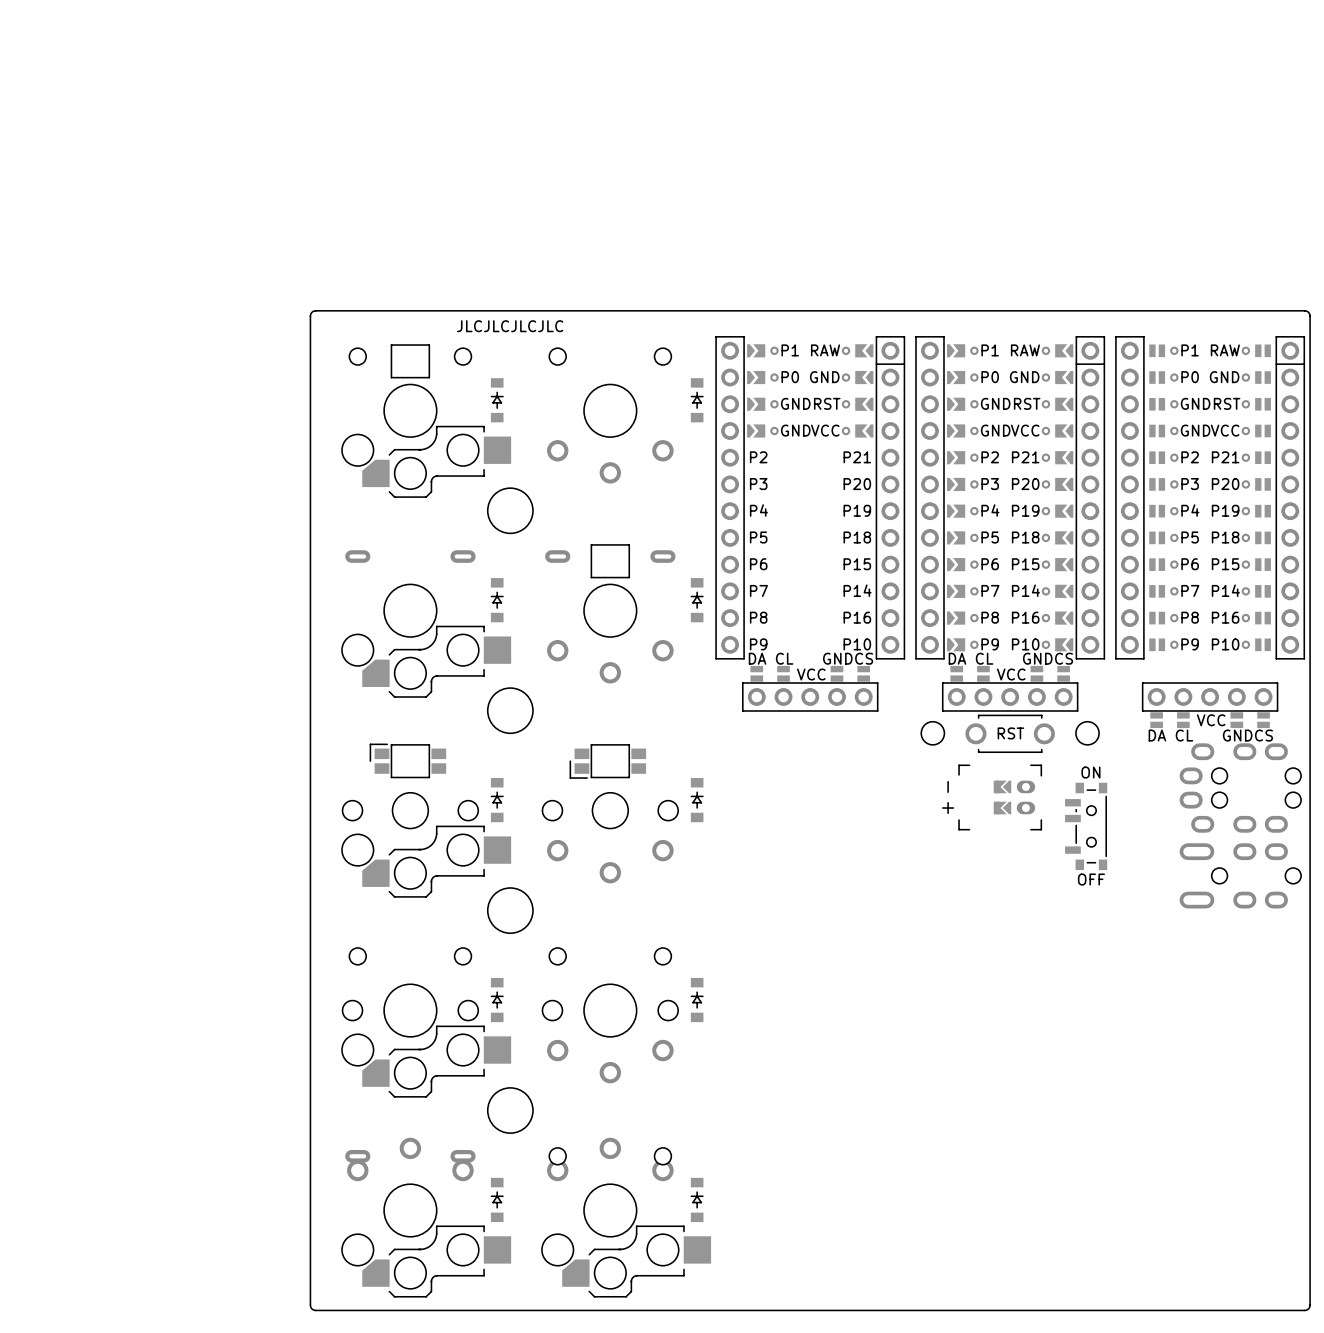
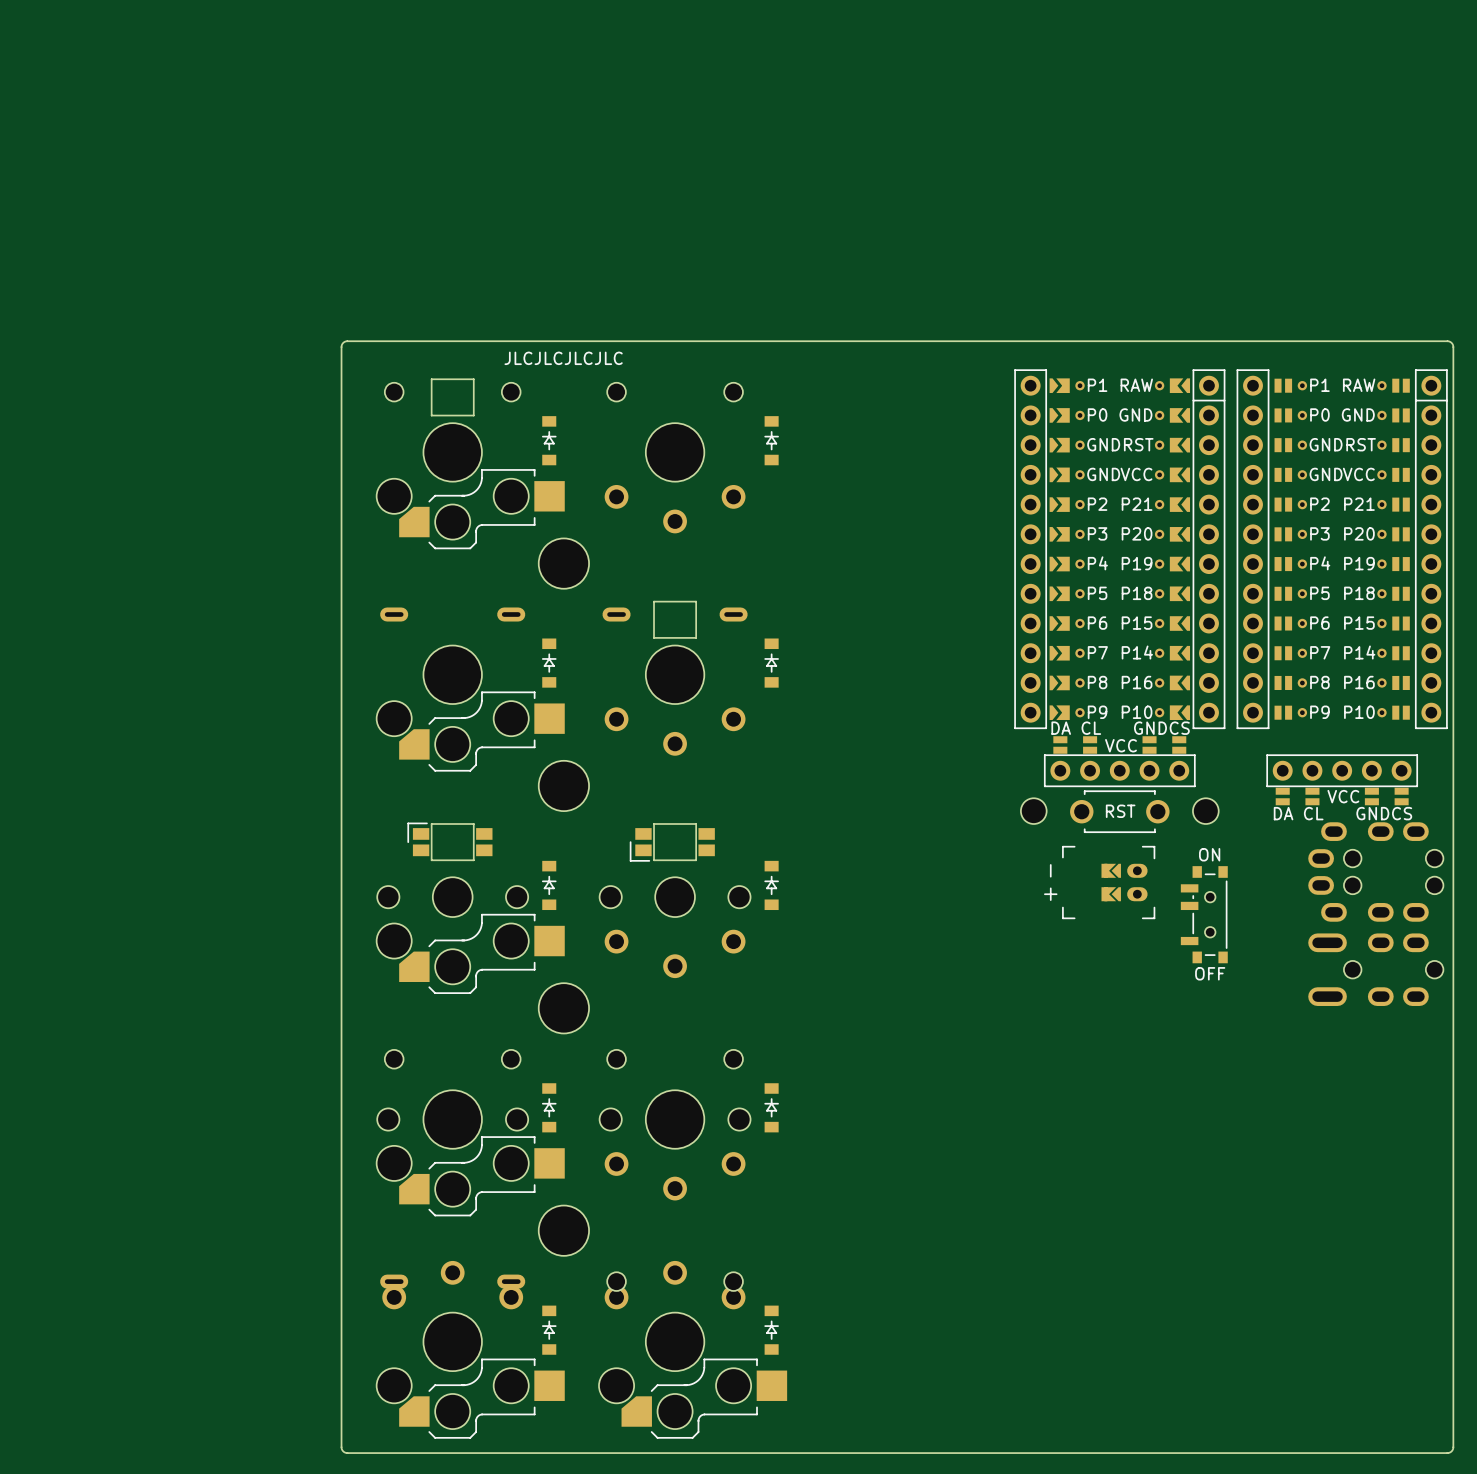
part: (810, 497) -> none
part: (810, 688) -> none

